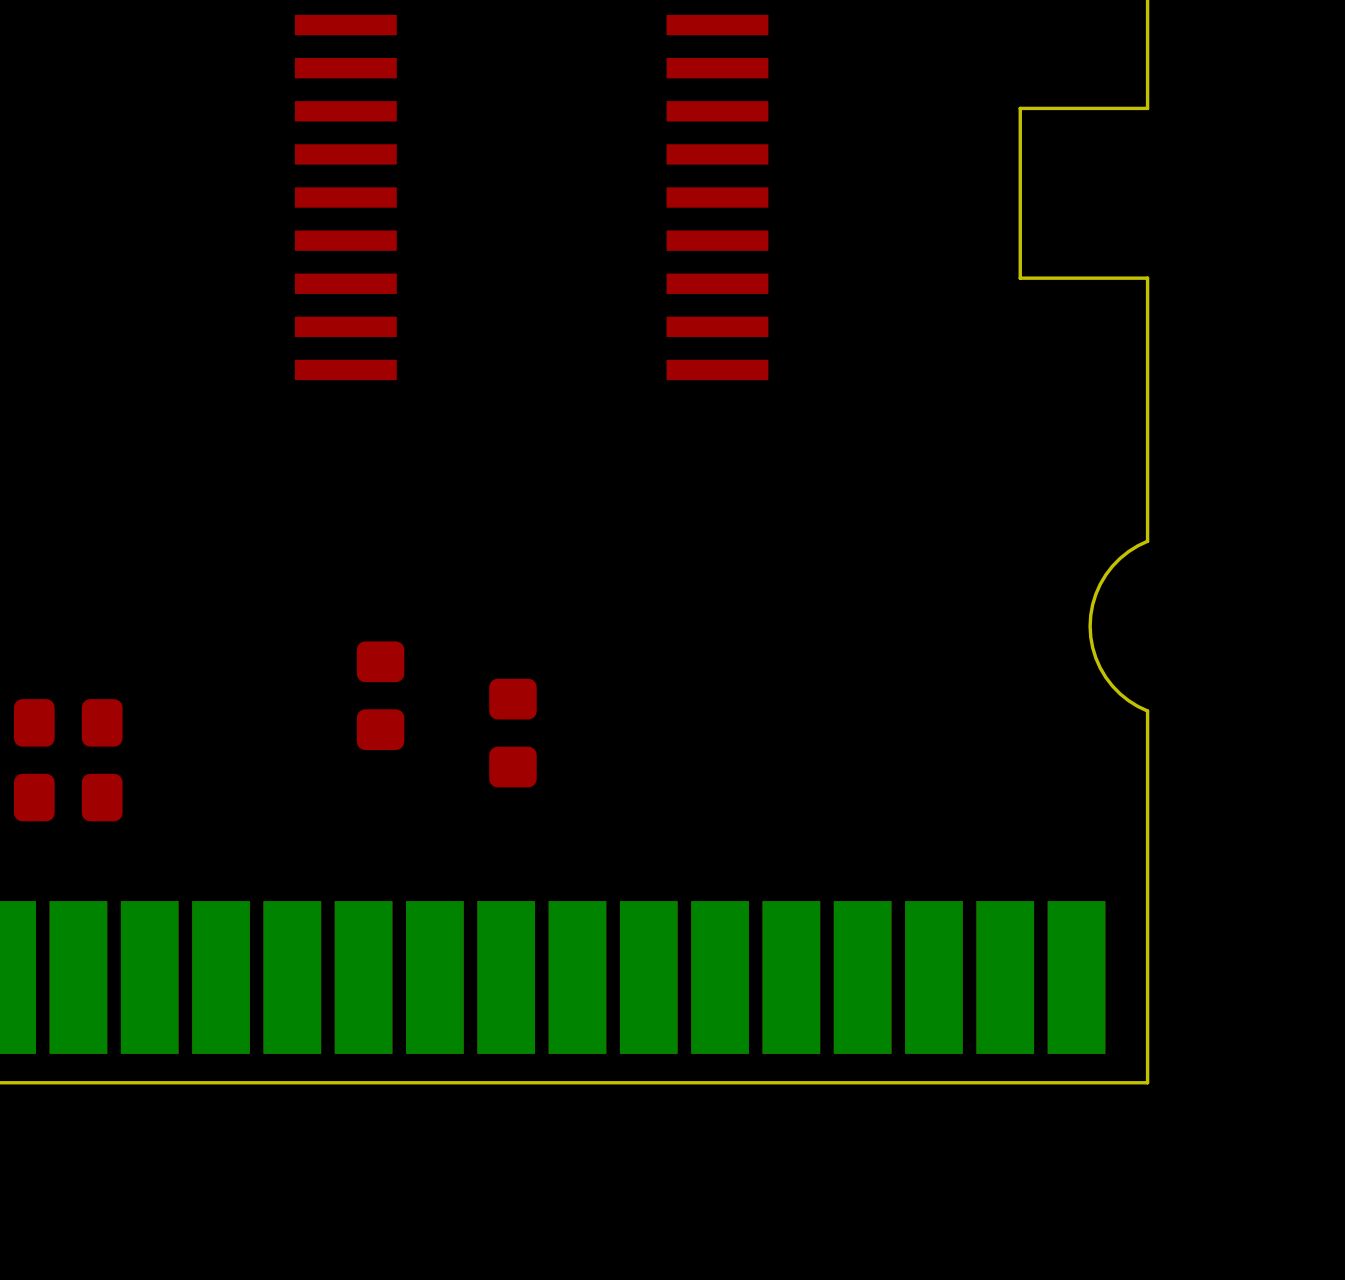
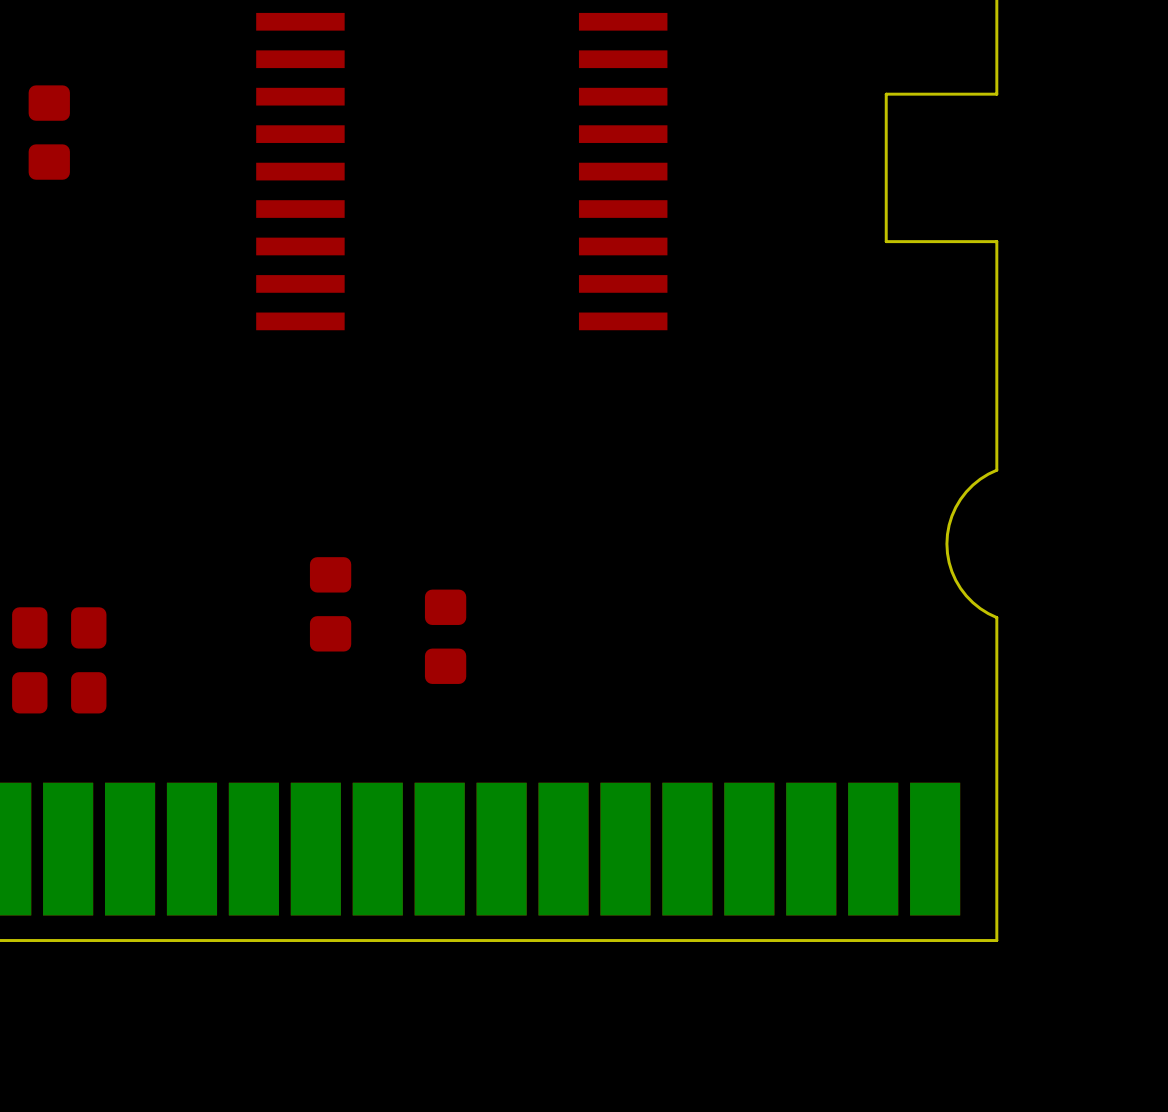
part: none -> (49, 132)

